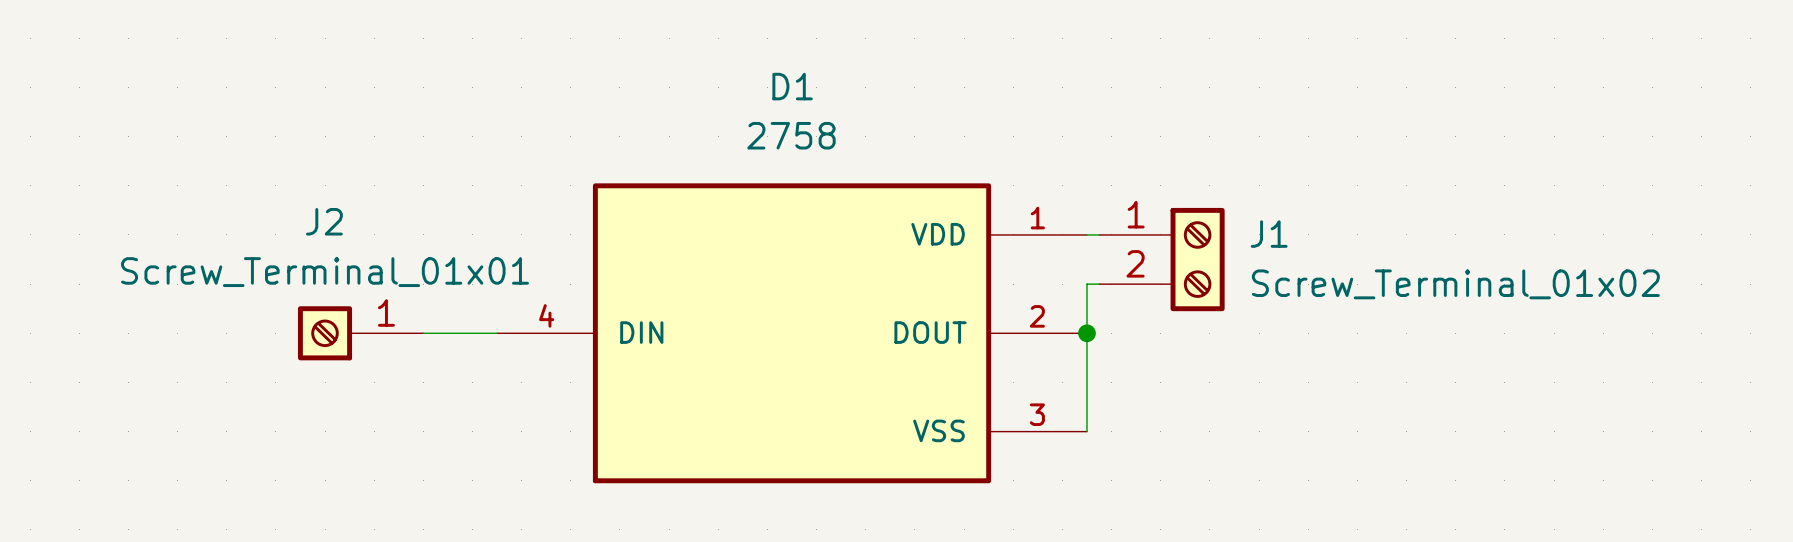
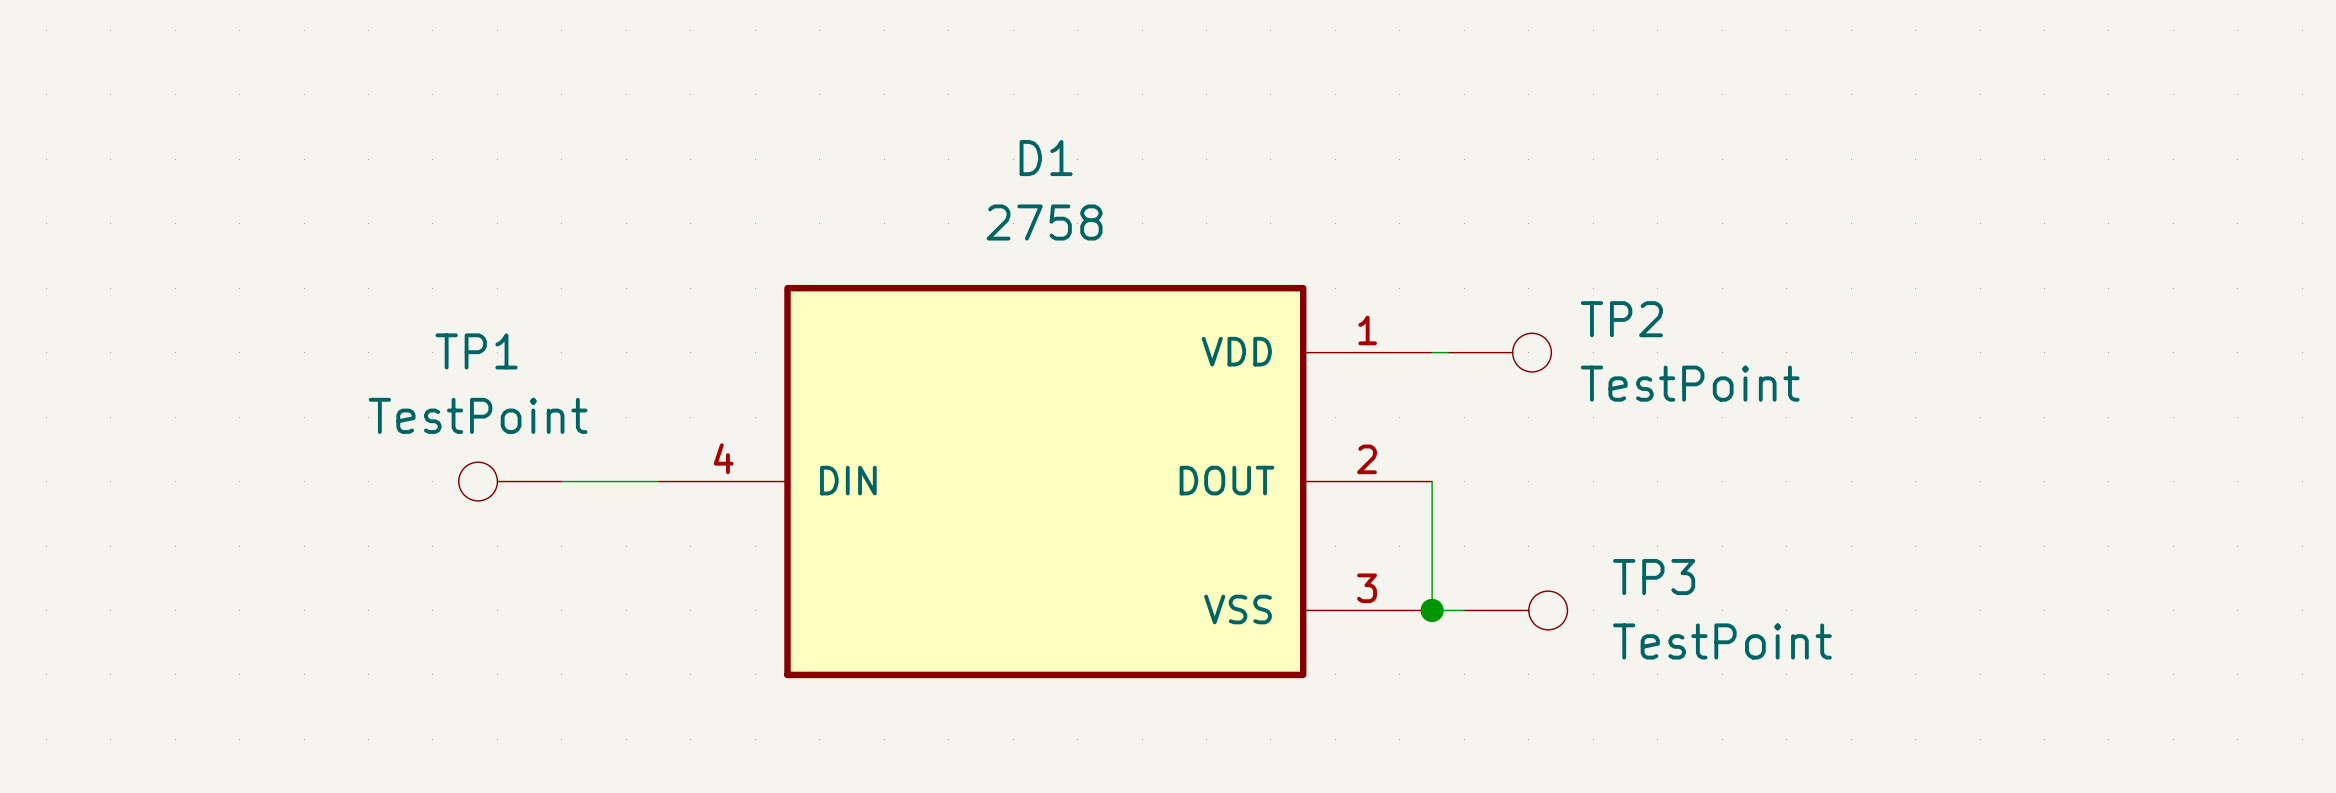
TP2: none -> TestPoint (1499, 352)
J1: Screw_Terminal_01x02 (1161, 259) -> none
wire: (1099, 284) (1086, 284) (1086, 333) -> none
J2: Screw_Terminal_01x01 (360, 333) -> none
TP1: none -> TestPoint (510, 481)
junction position: (1086, 333) -> (1432, 610)
wire: none -> (1432, 610) (1464, 610)
TP3: none -> TestPoint (1515, 610)

